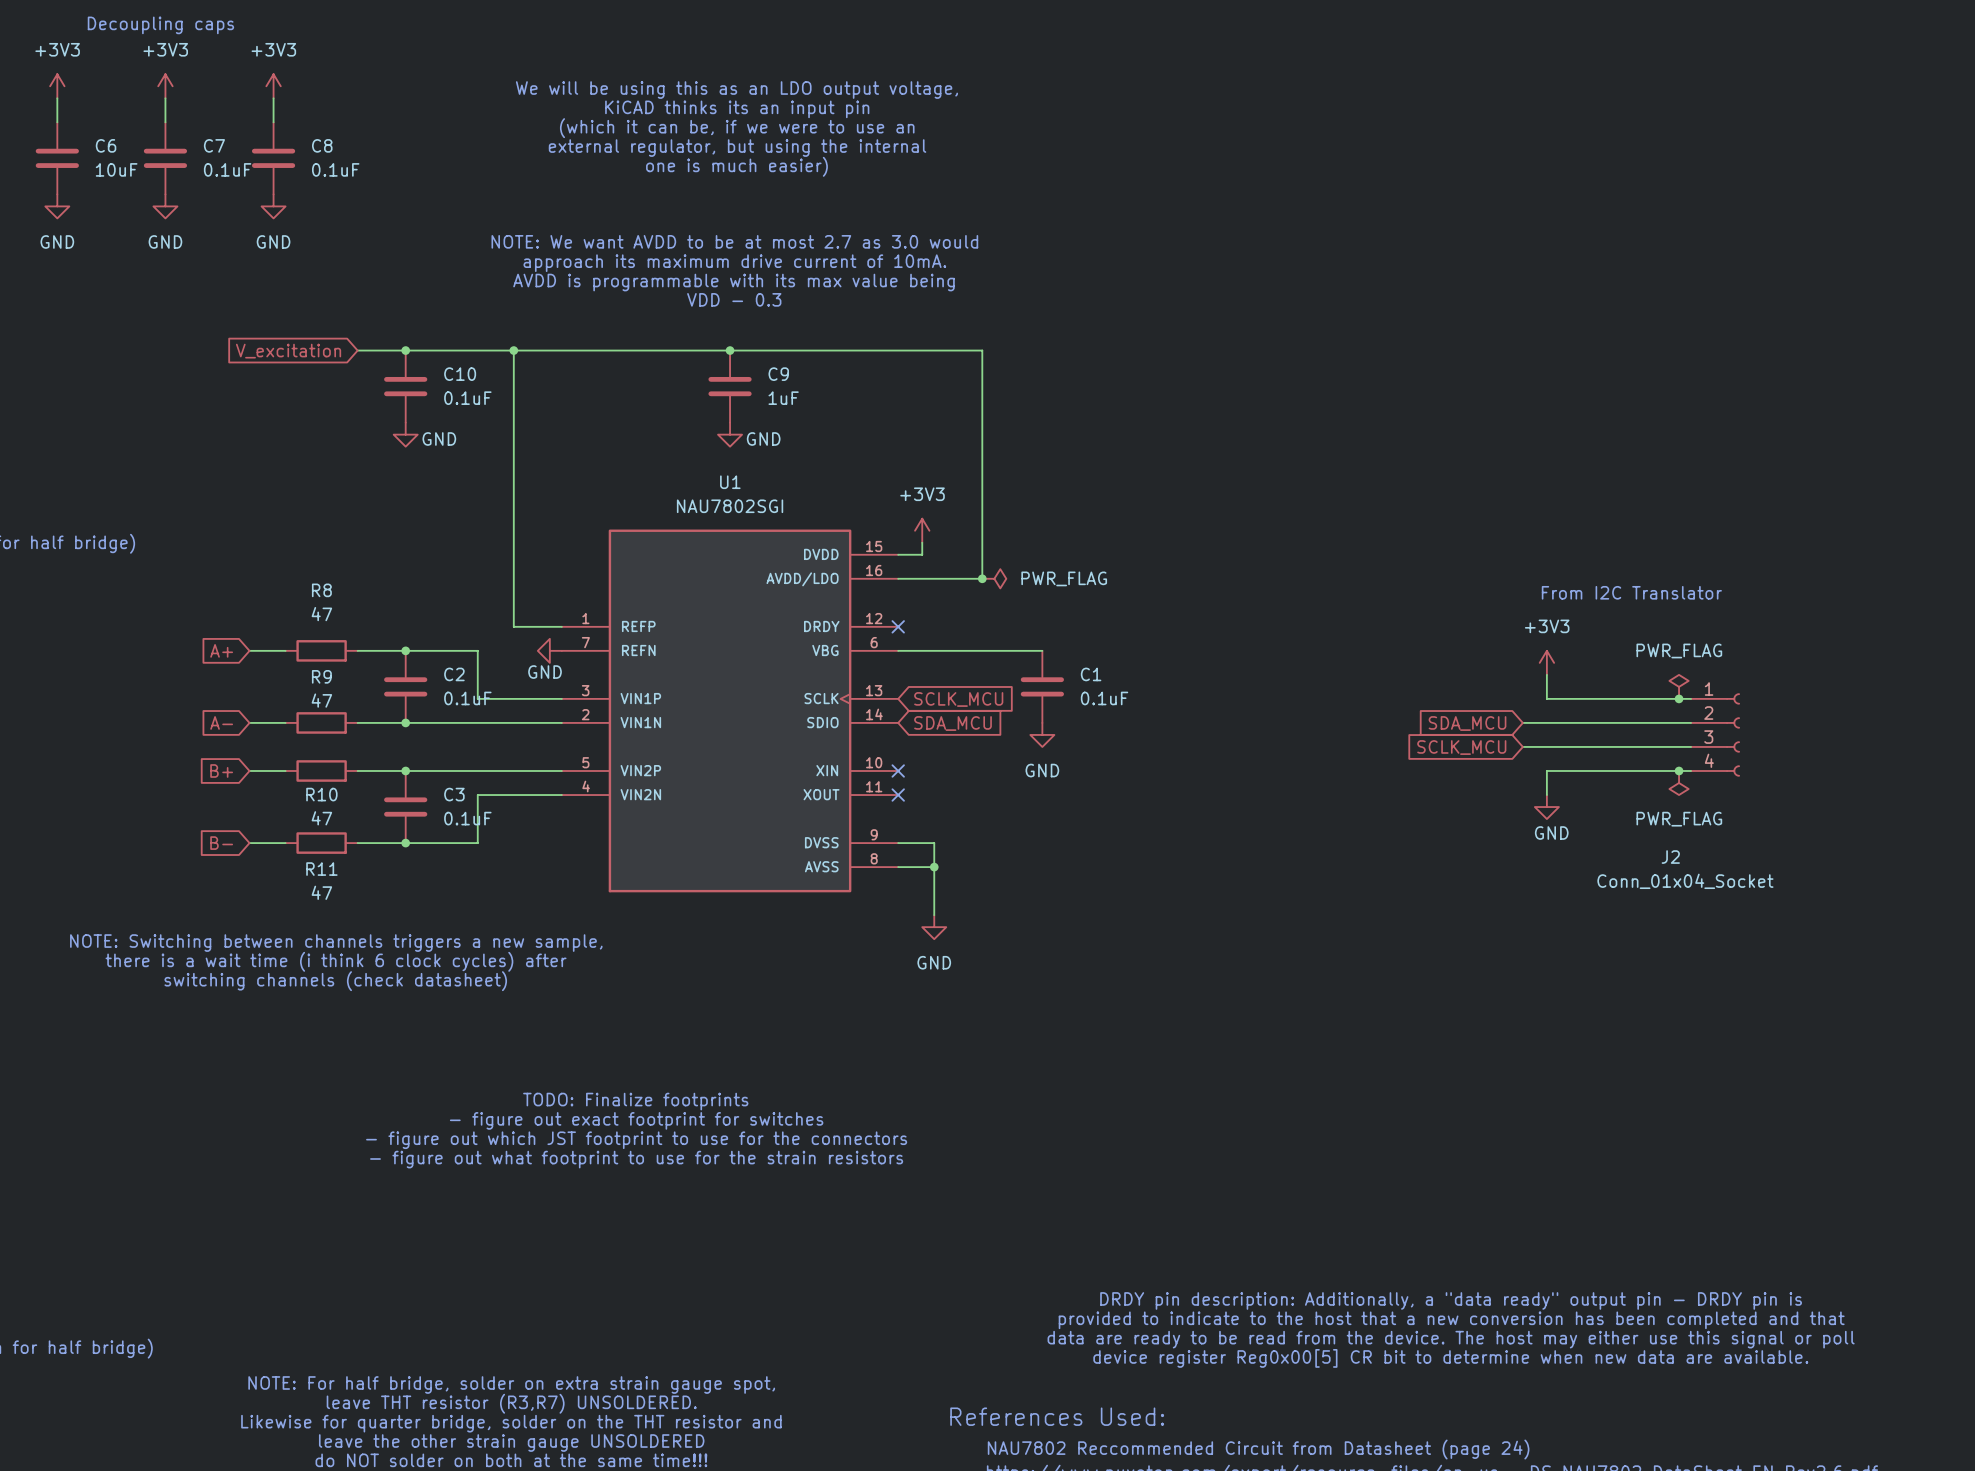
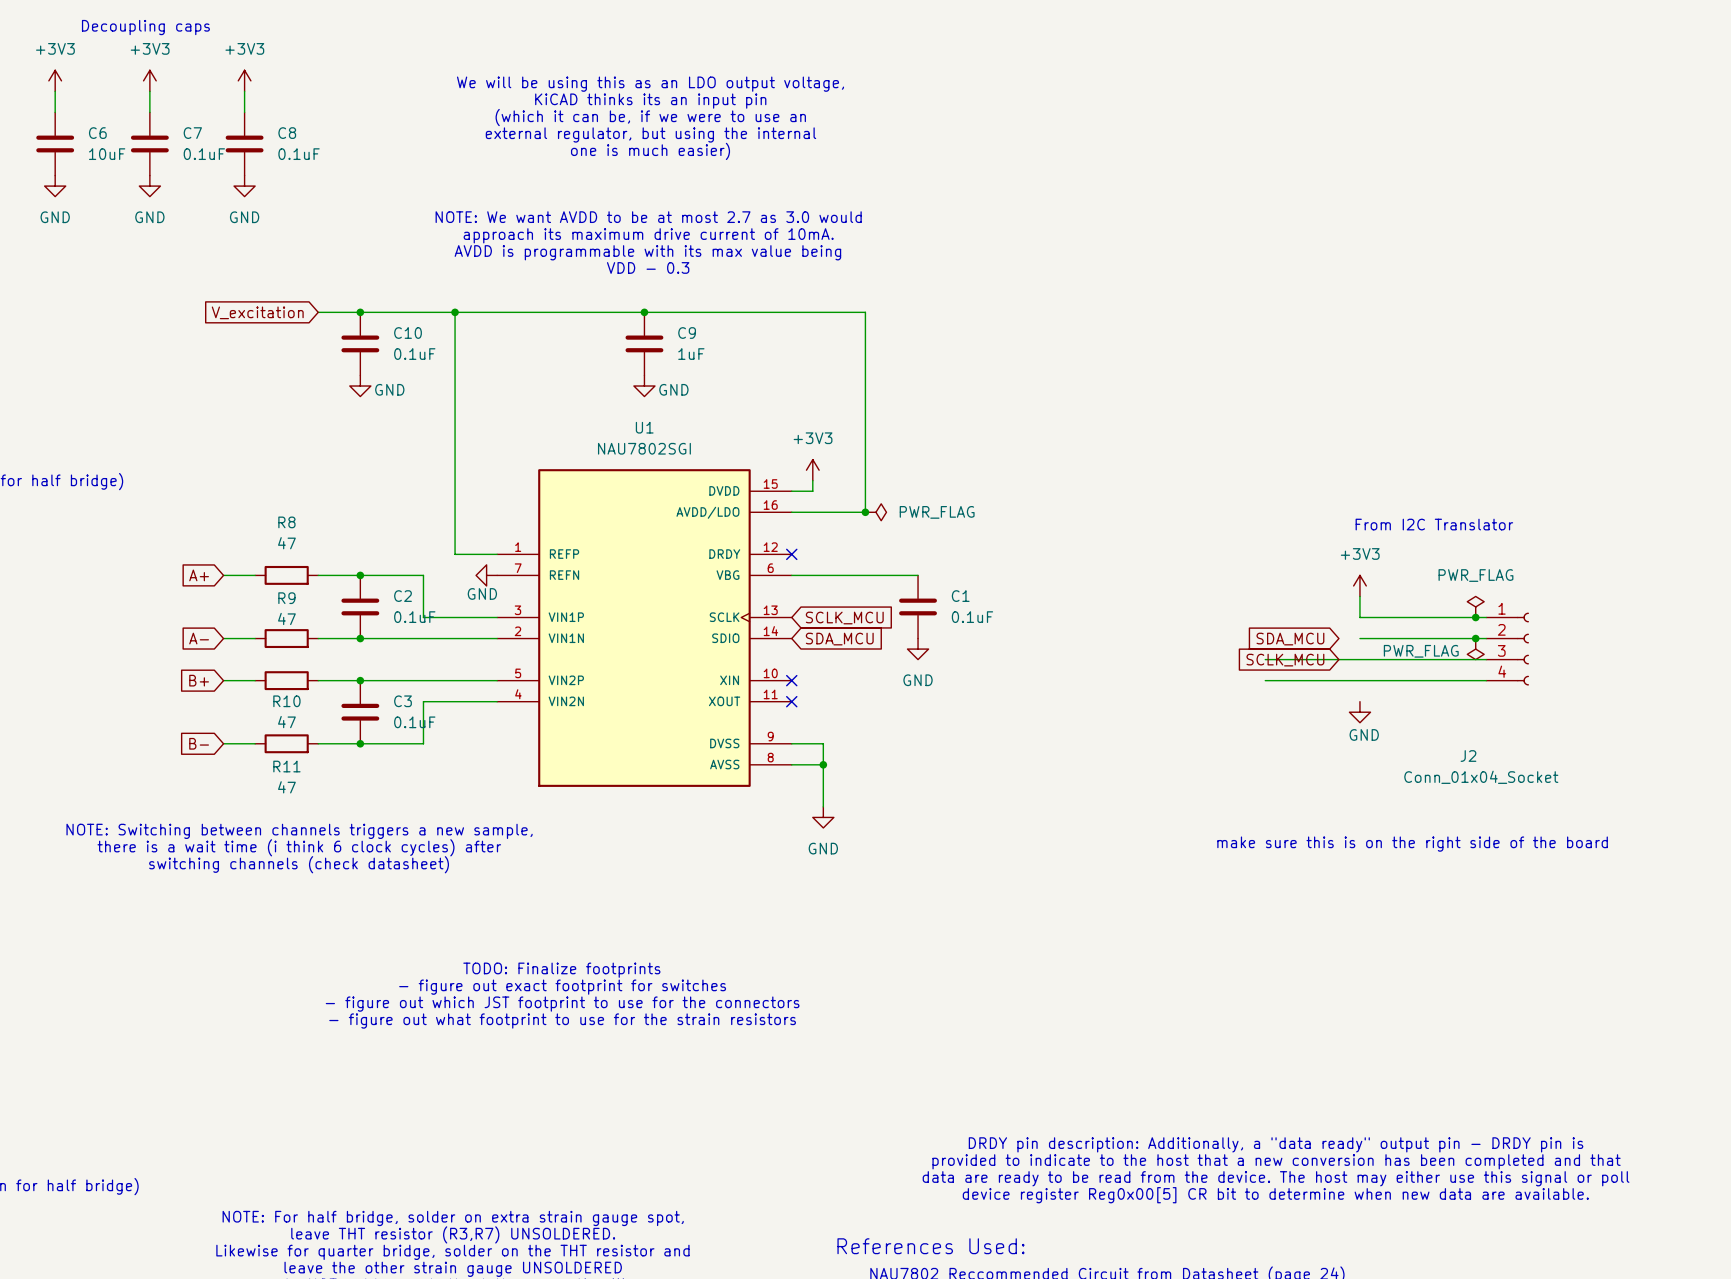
wire: (1522, 722) (1546, 722) -> none
wire: none -> (1265, 659) (1338, 659)
wire: (1546, 770) (1546, 795) -> (1359, 680) (1265, 680)
junction position: (1679, 770) -> (1475, 638)
power symbol position: PWR_FLAG (1679, 783) -> PWR_FLAG (1475, 649)
power symbol text position: PWR_FLAG (1679, 819) -> PWR_FLAG (1421, 651)
text: none -> make sure this is on the right side of the board (1412, 844)

